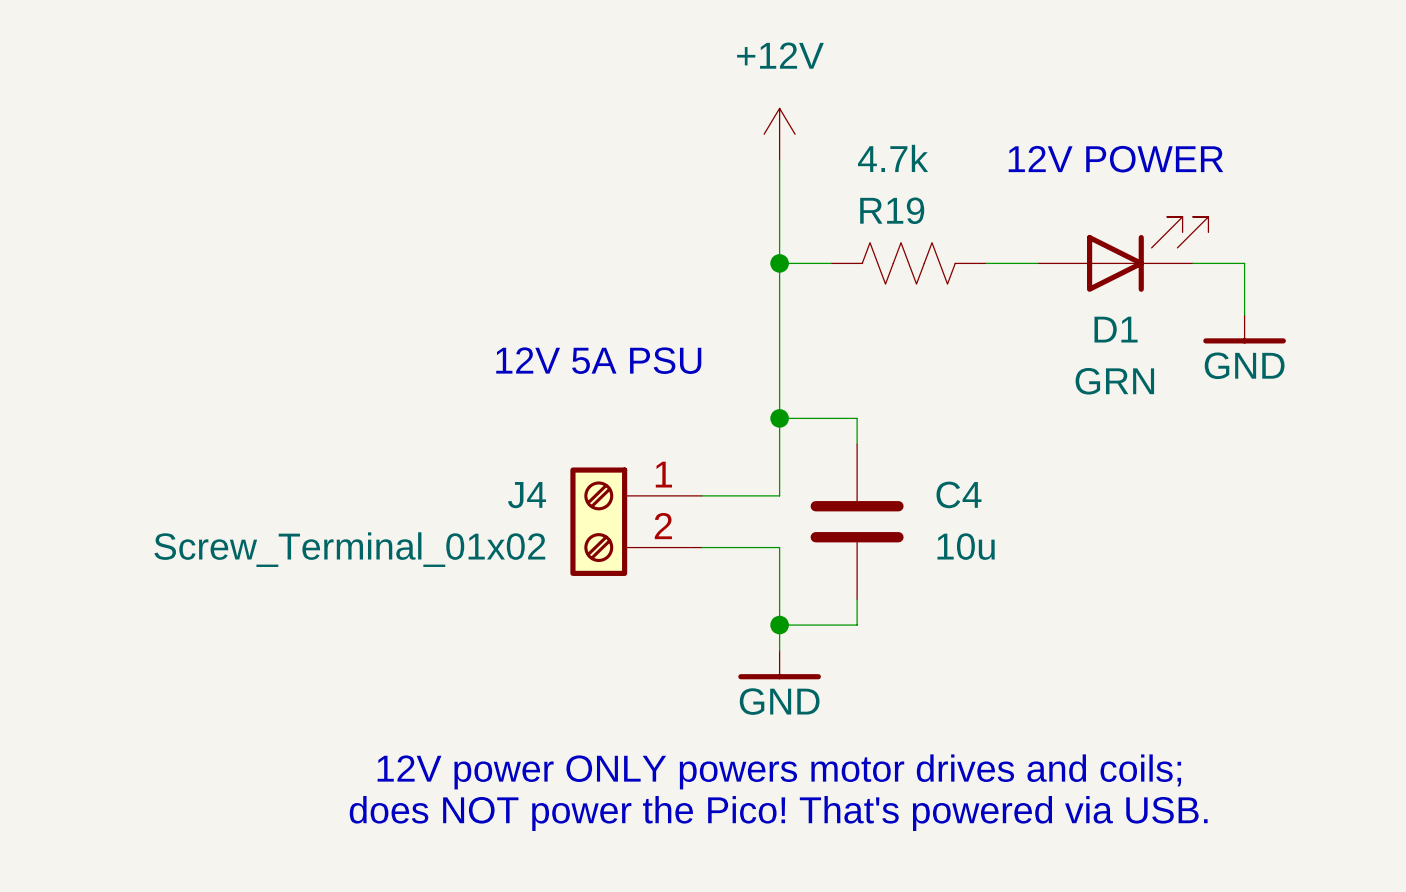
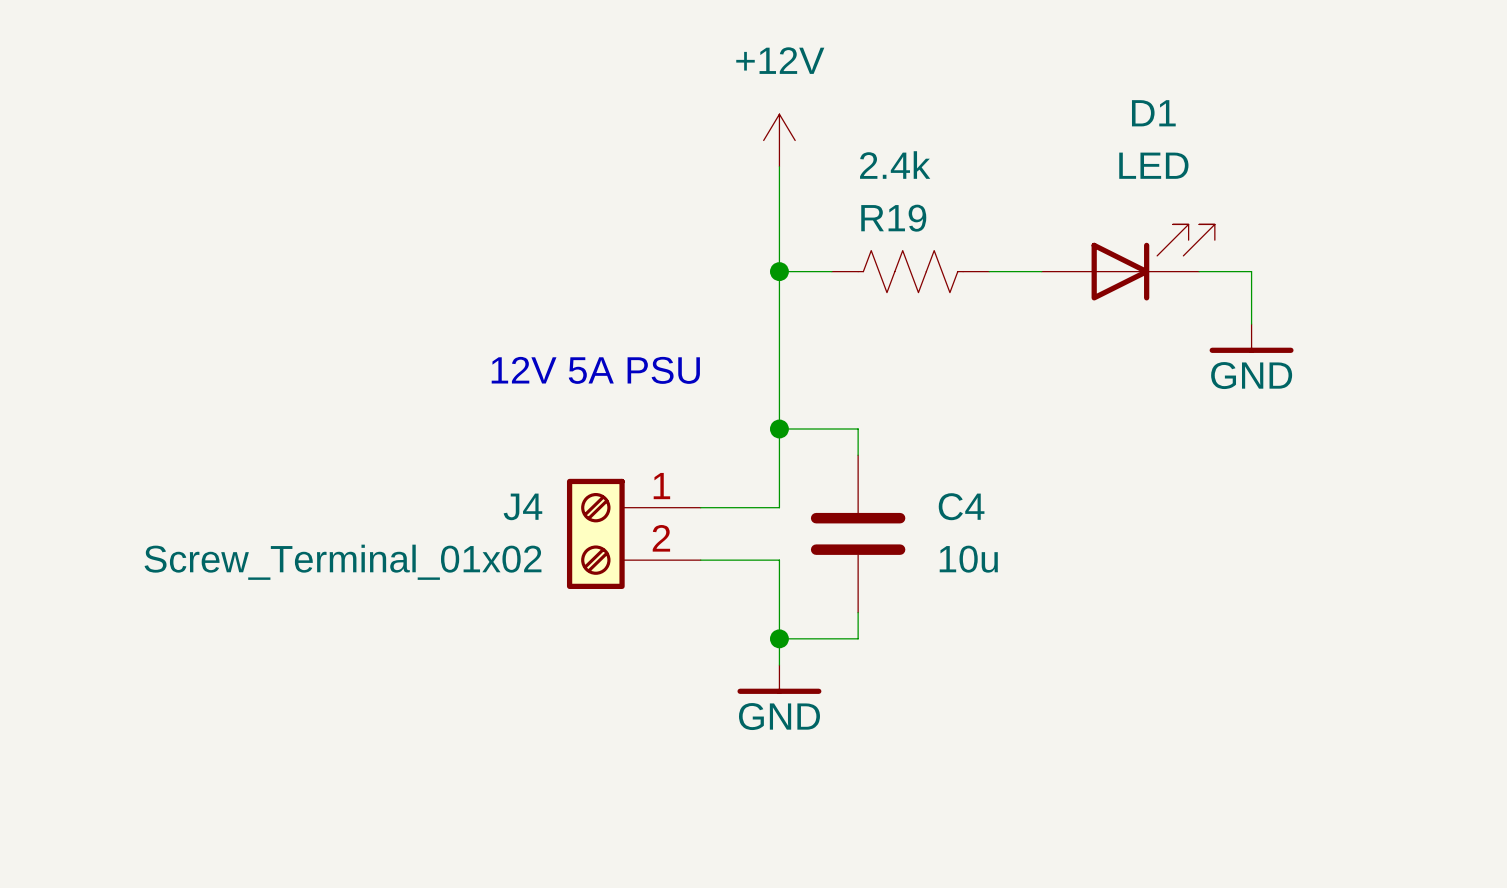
R19 value: 4.7k (893, 158) -> 2.4k (895, 165)
text: 12V POWER (1115, 159) -> none
D1 name position: D1 (1116, 329) -> D1 (1153, 113)
D1 value: GRN (1114, 381) -> LED (1153, 165)
text: 12V power ONLY powers motor drives and coils; (779, 771) -> none
text: does NOT power the Pico! That's powered via USB. (778, 813) -> none

